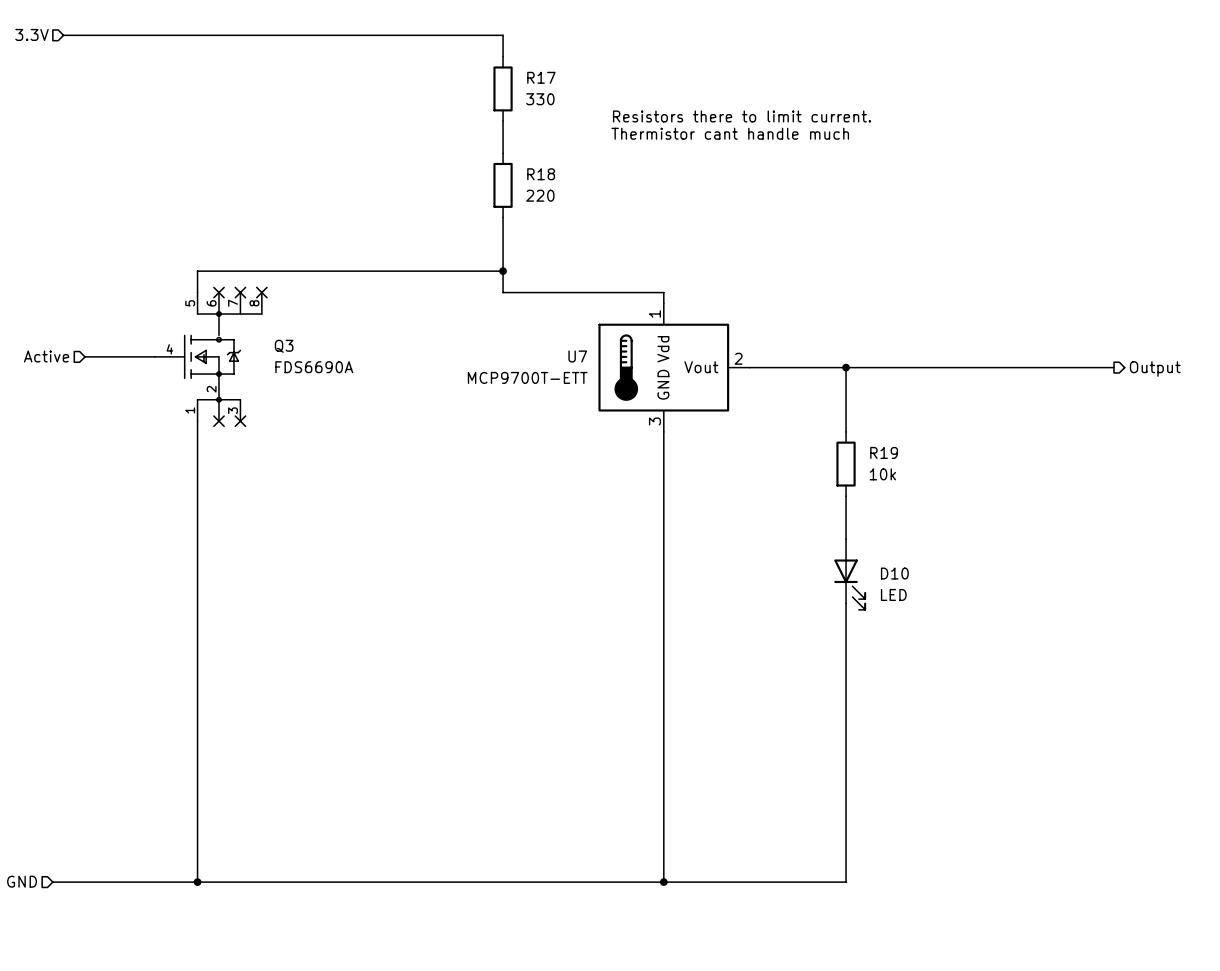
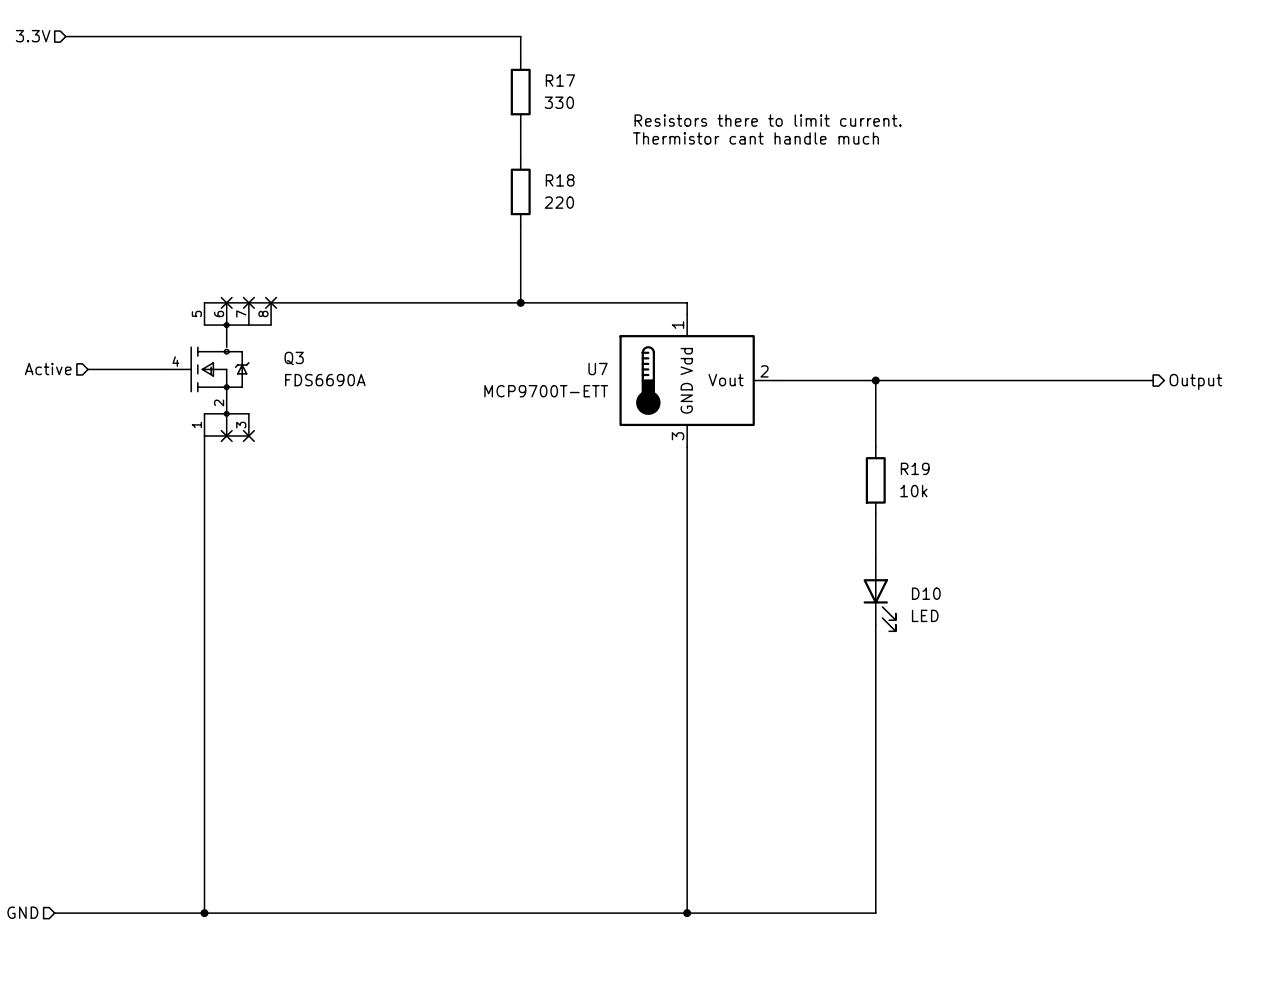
wire: (503, 271) (197, 271) (197, 292) -> (520, 302) (204, 302)
junction position: (503, 271) -> (520, 302)
wire: none -> (204, 436) (248, 436)

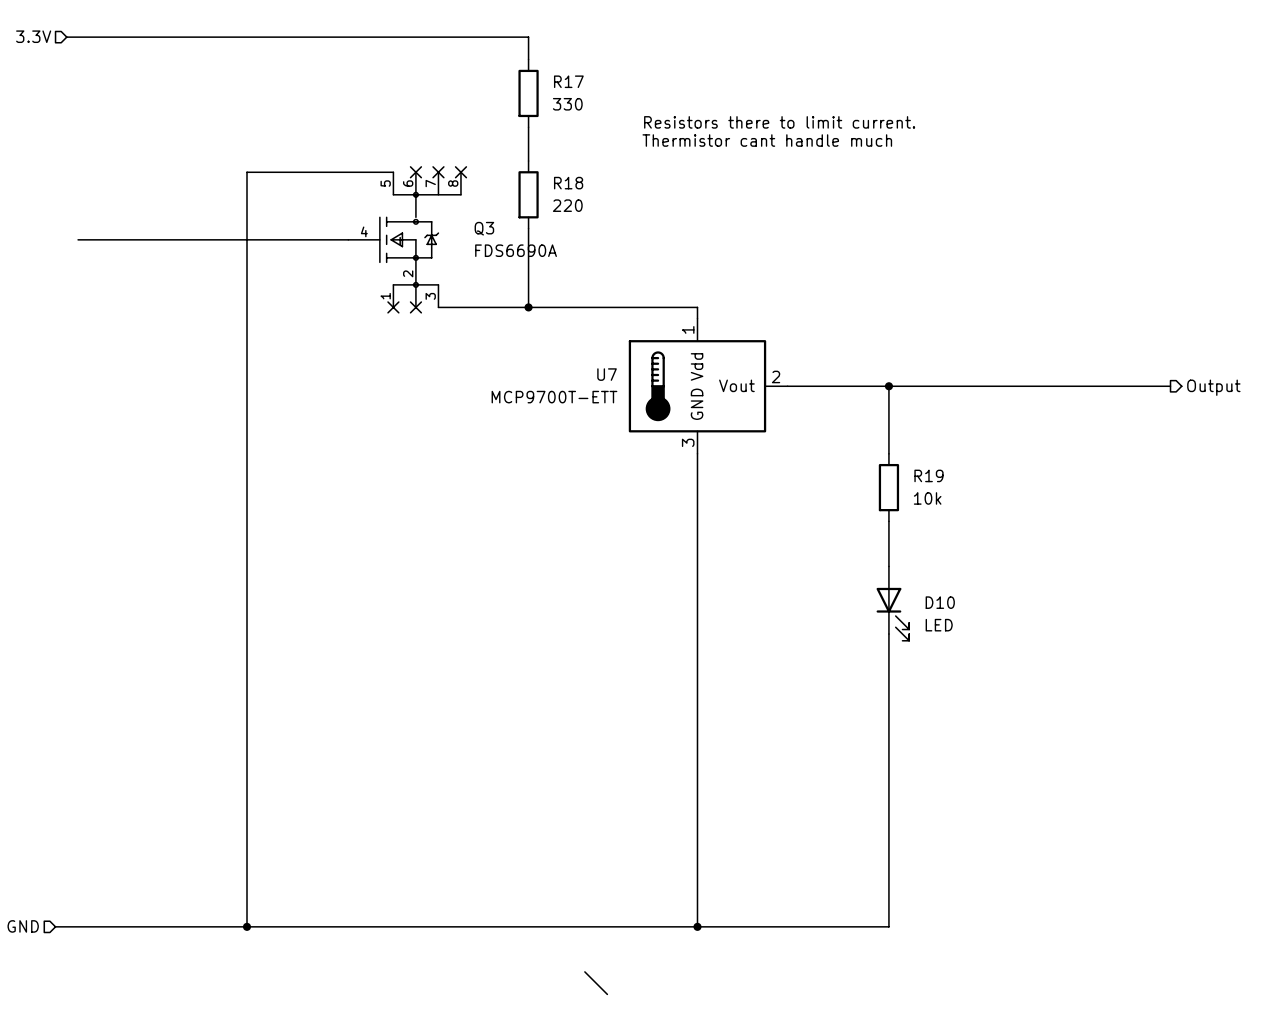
wire: none -> (393, 172) (247, 172) (247, 926)
no-connect mark: none -> (415, 172)
no-connect mark: none -> (438, 172)
no-connect mark: none -> (460, 172)
wire: none -> (78, 239) (348, 239)
wire: (204, 302) (431, 302) -> none
no-connect mark: (226, 302) -> none
no-connect mark: (248, 302) -> none
no-connect mark: (271, 302) -> none
no-connect mark: none -> (393, 307)
no-connect mark: none -> (415, 307)
hierarchical label: Active (48, 369) -> none
wire: (88, 369) (160, 369) -> none
Q3 position: (215, 369) -> (404, 239)
no-connect mark: (226, 436) -> none
wire: (248, 436) (204, 436) (204, 913) -> none
no-connect mark: (248, 436) -> none
junction position: (204, 913) -> (247, 926)
wire: none -> (584, 971) (607, 994)

